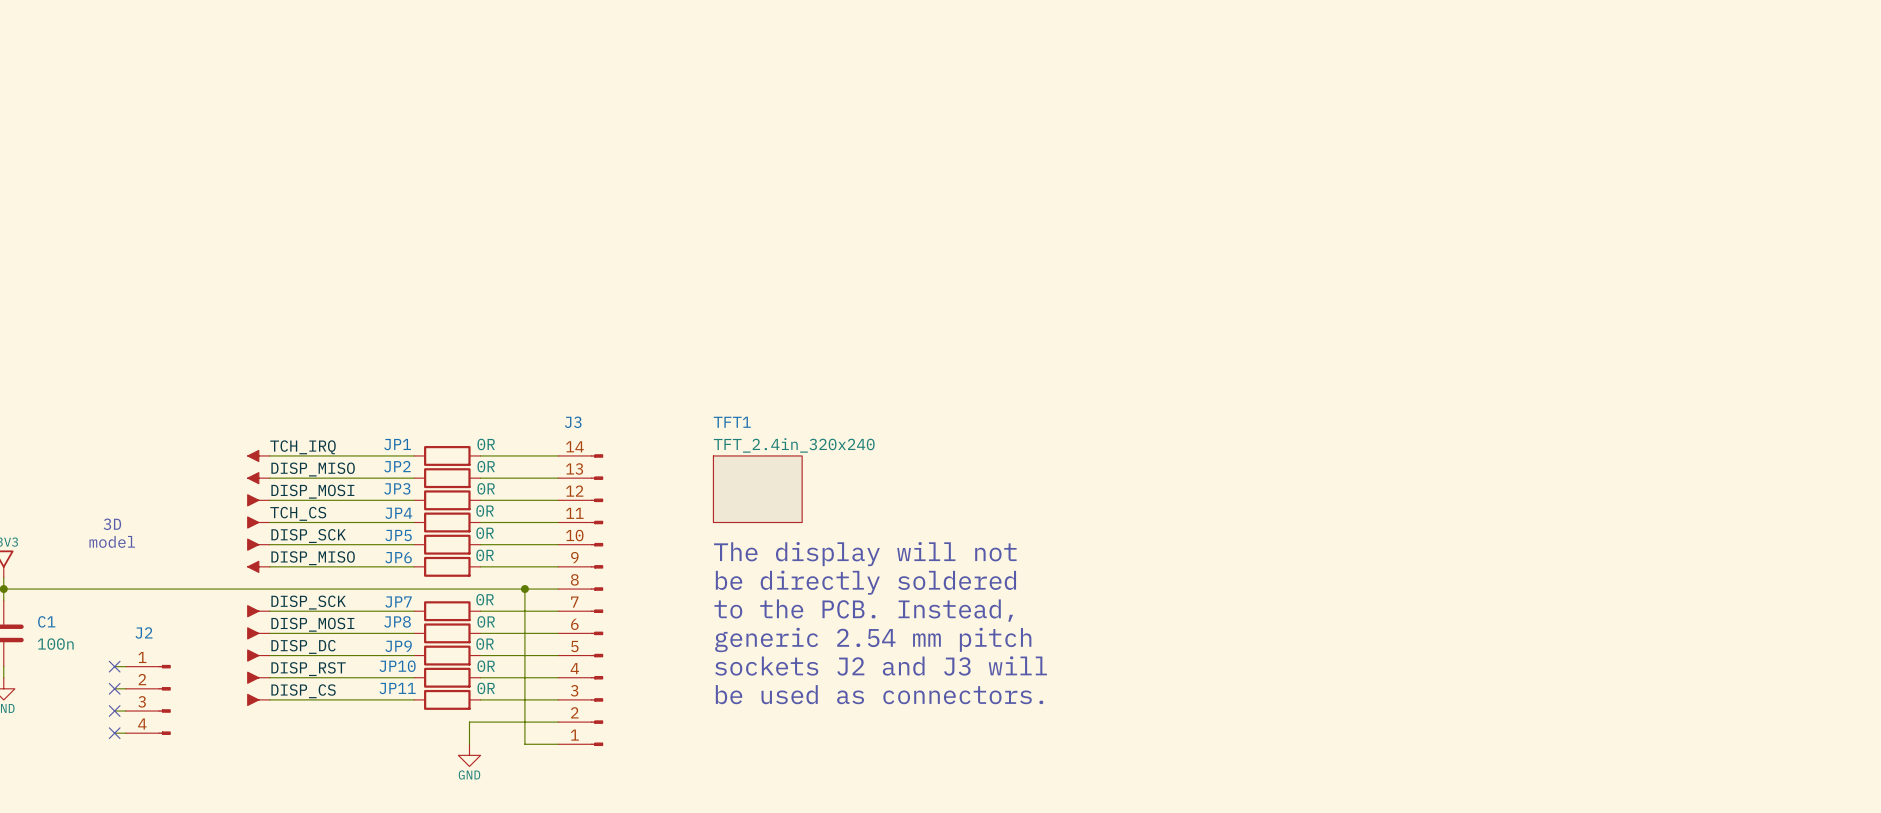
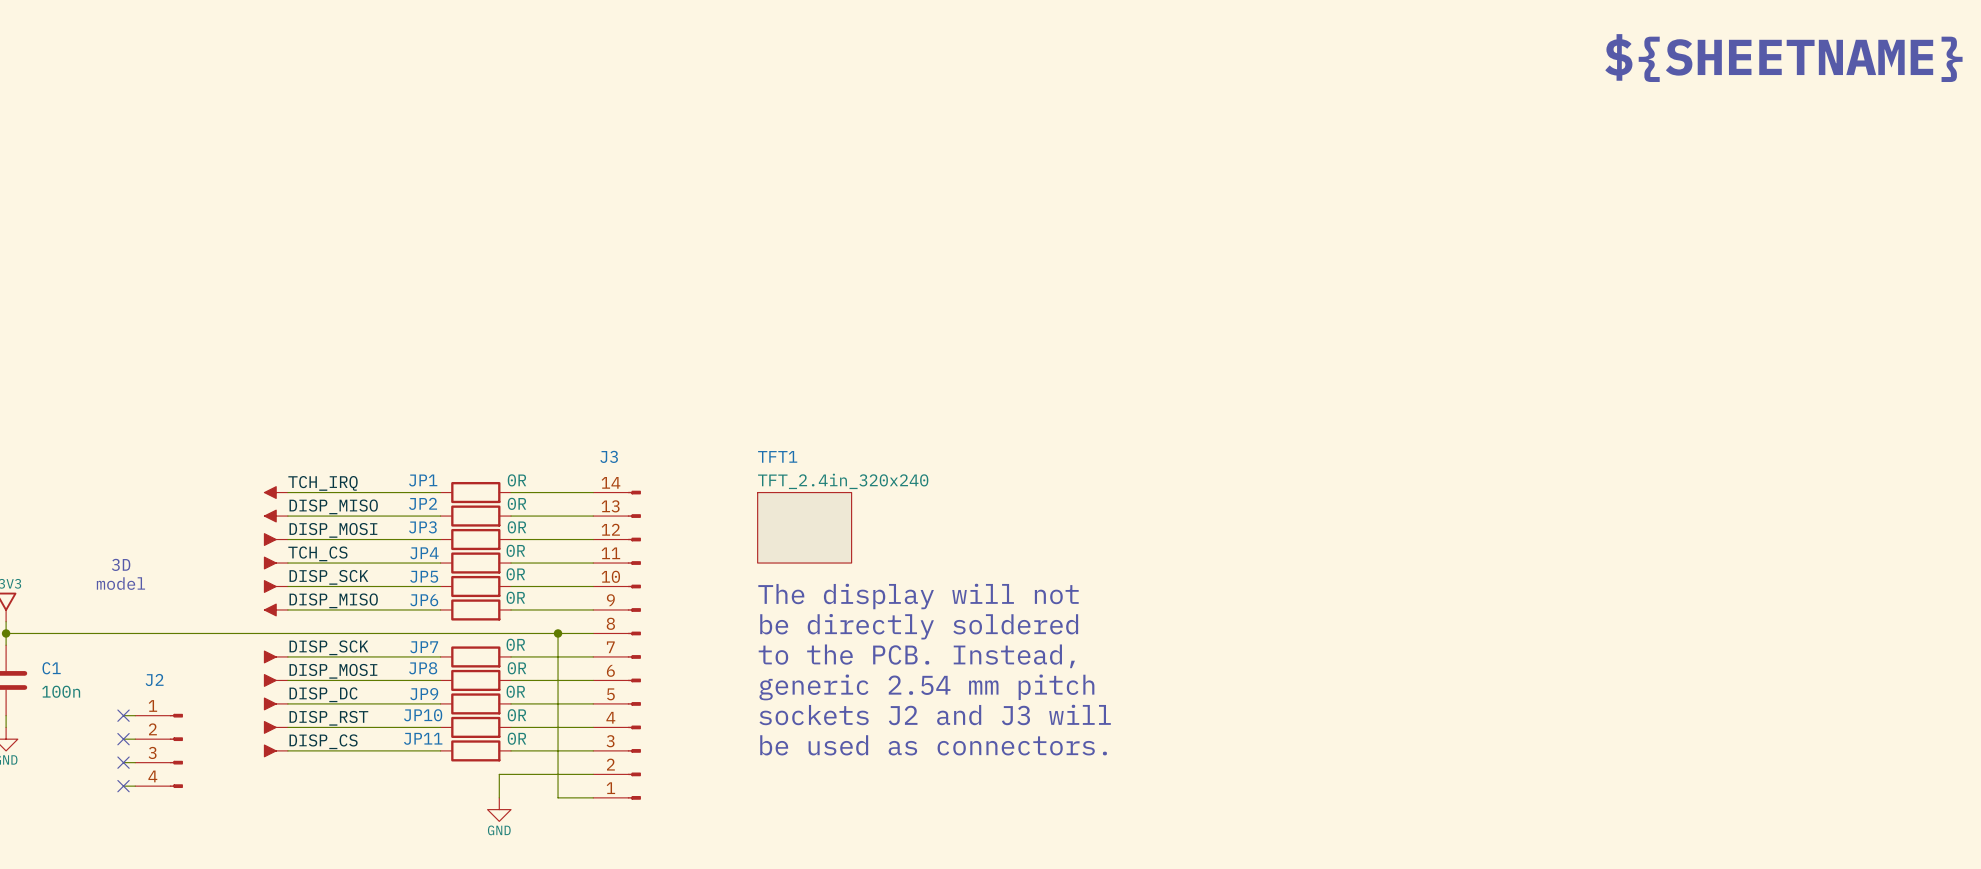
text: none -> ${SHEETNAME} (1783, 58)

